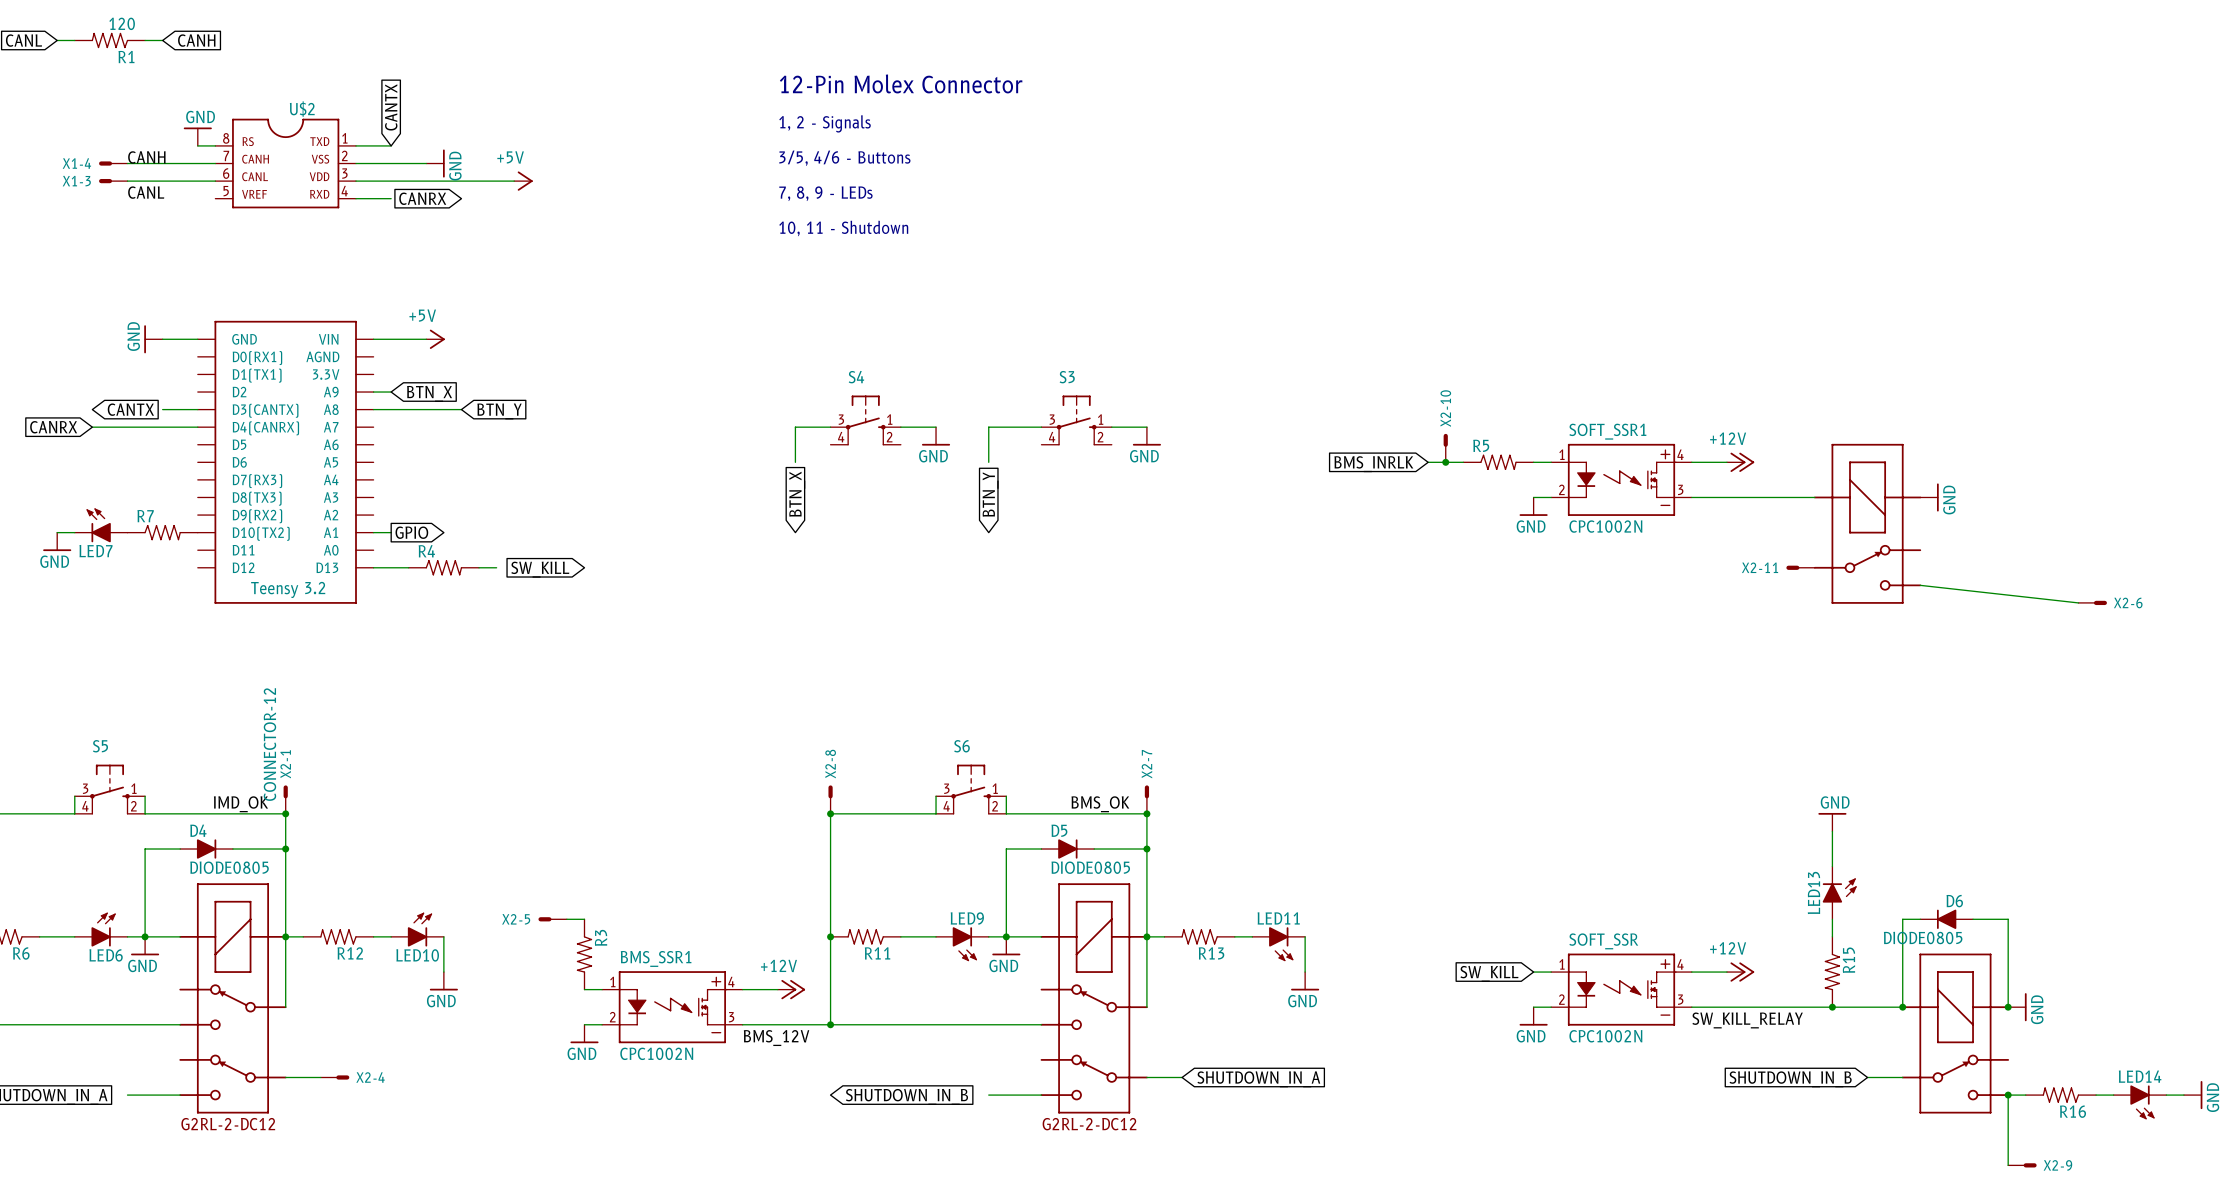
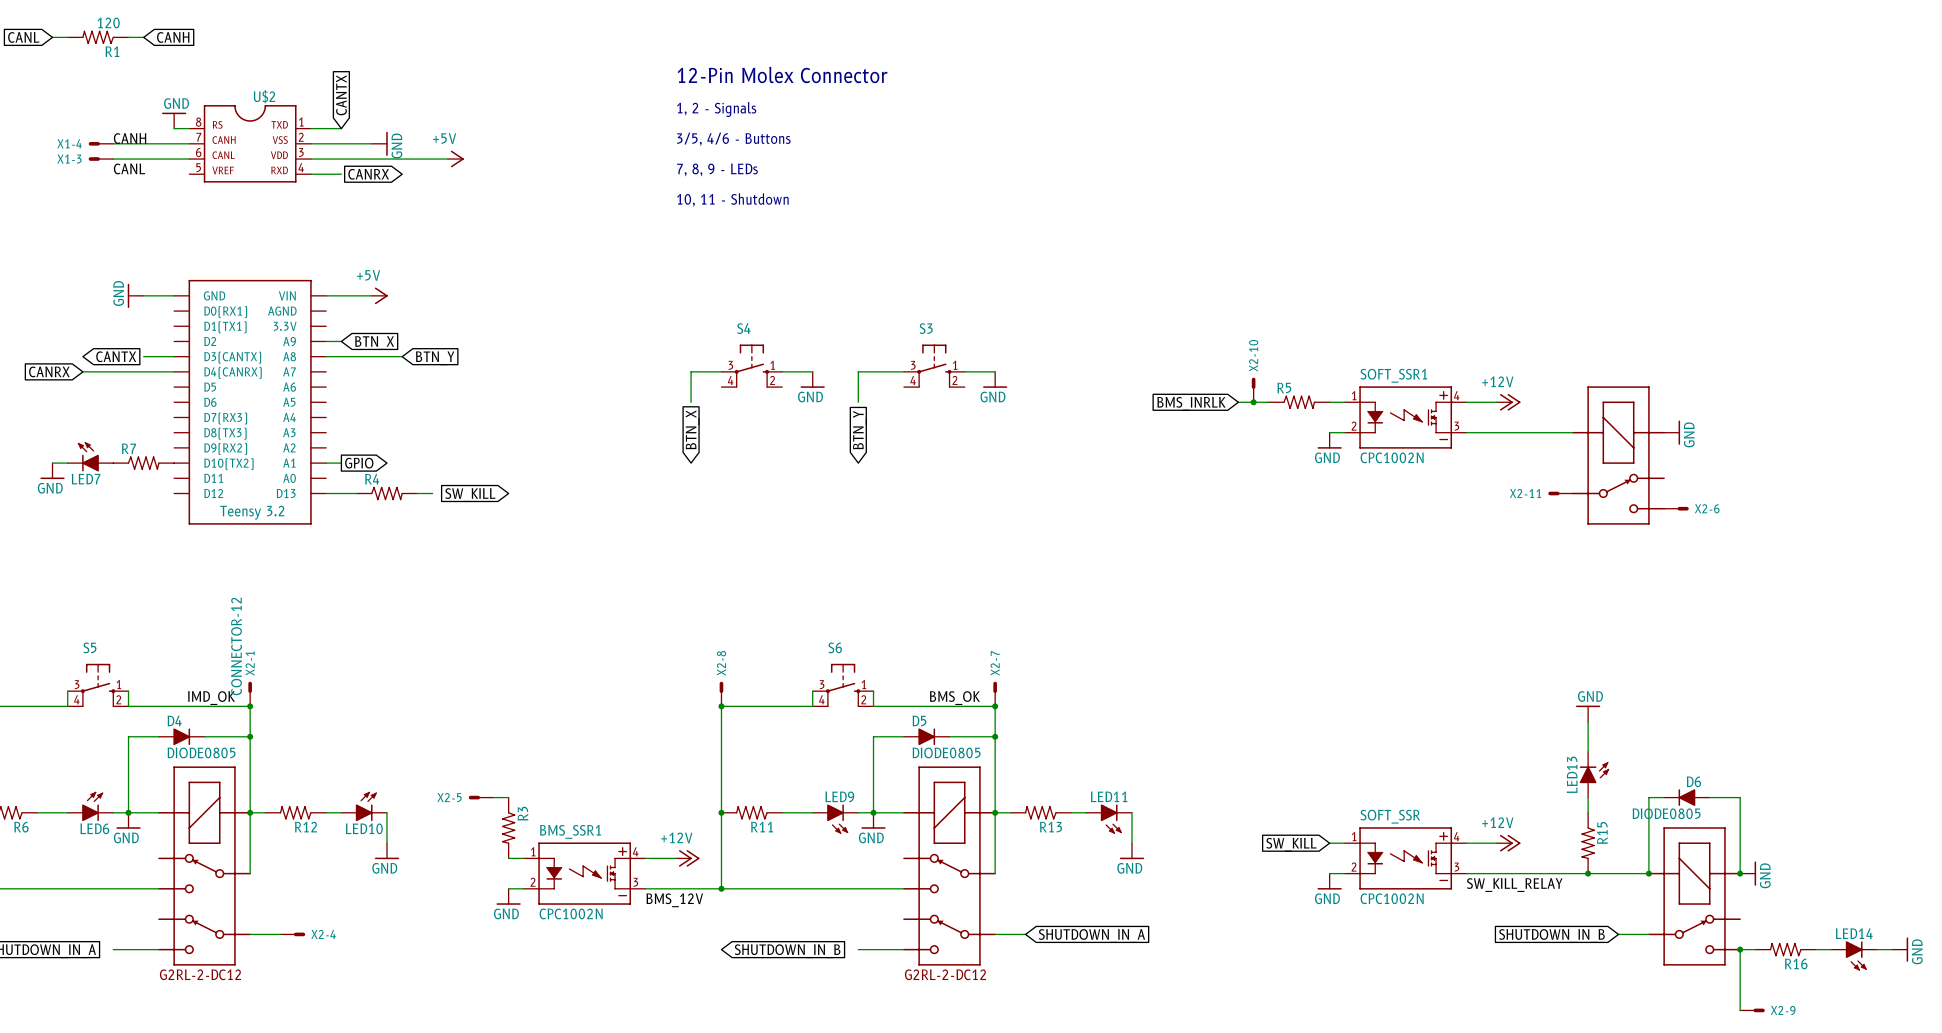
wire: (1920, 585) (2078, 602) -> none
X2-6 position: (2092, 602) -> (1676, 508)

